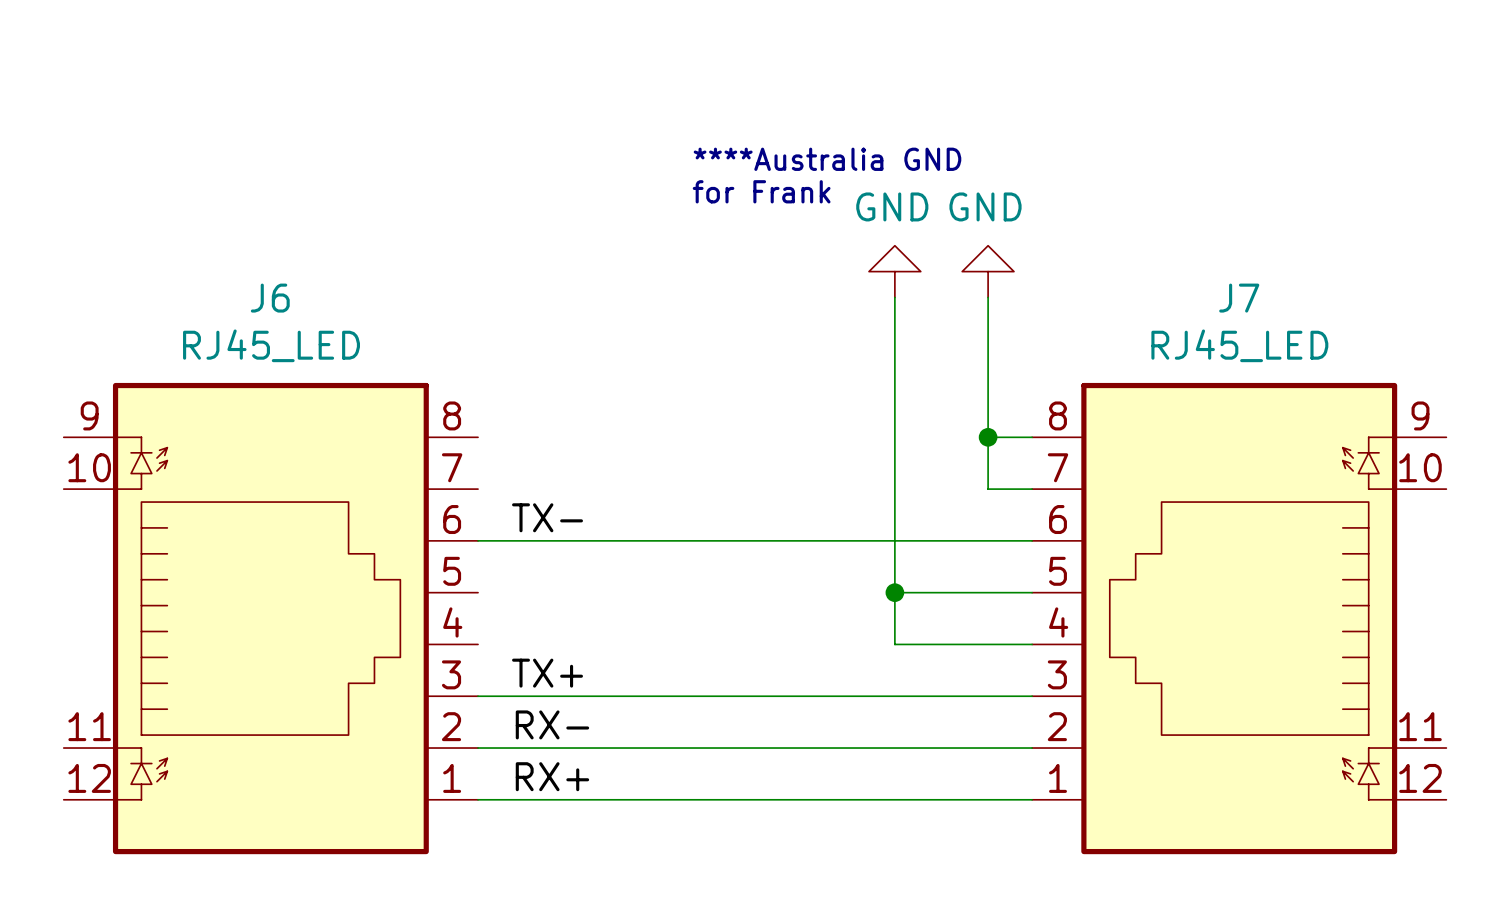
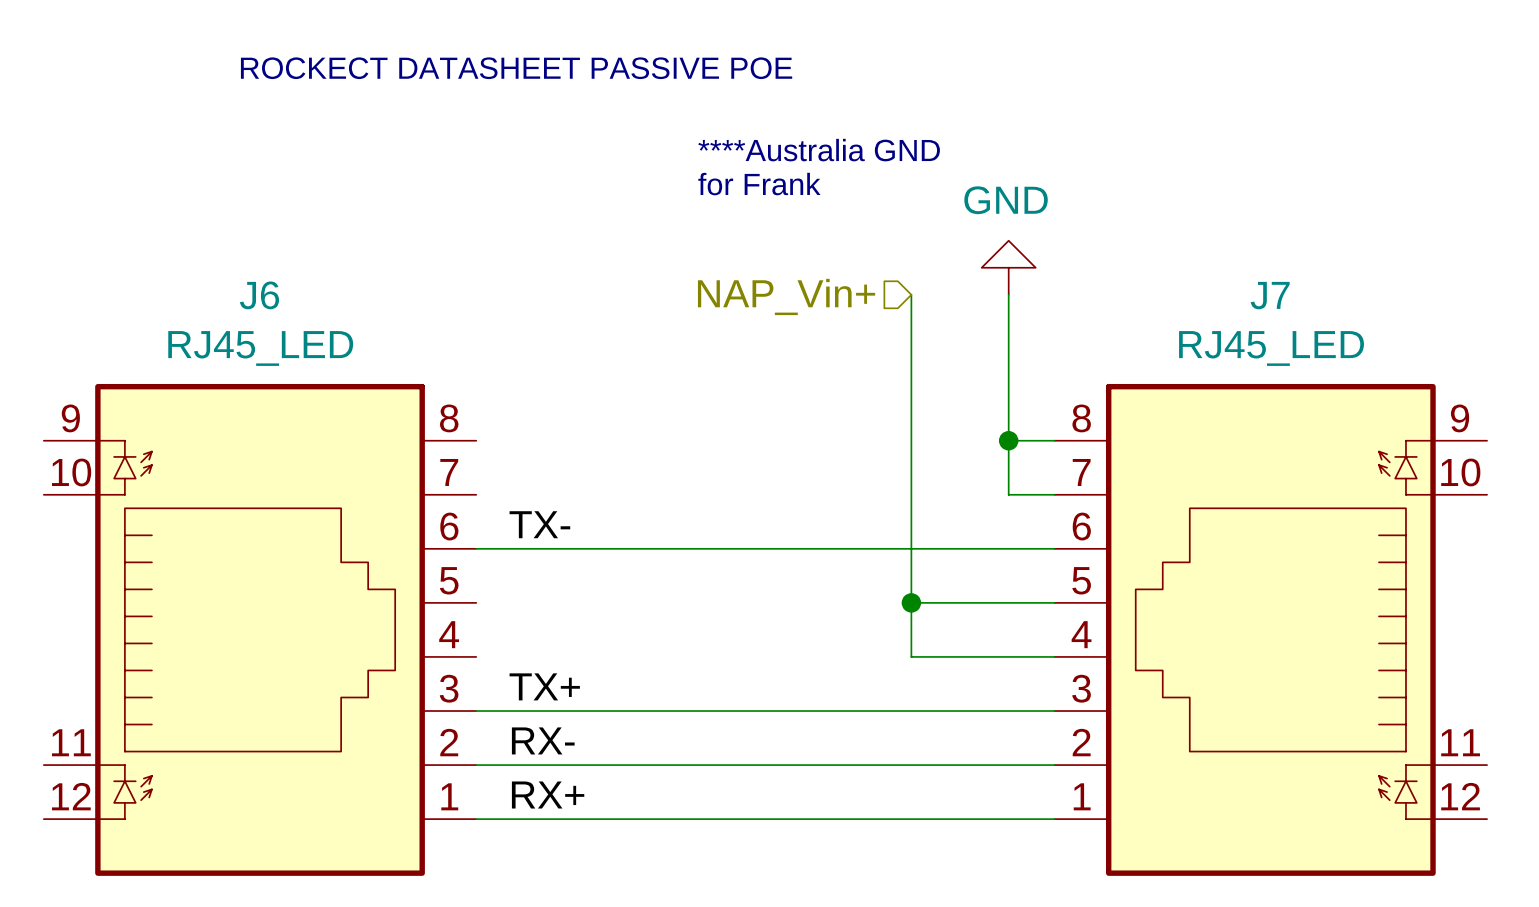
text: none -> ROCKECT DATASHEET PASSIVE POE (516, 68)
power symbol: GND (894, 271) -> none
hierarchical label: none -> NAP_Vin+ (786, 296)

